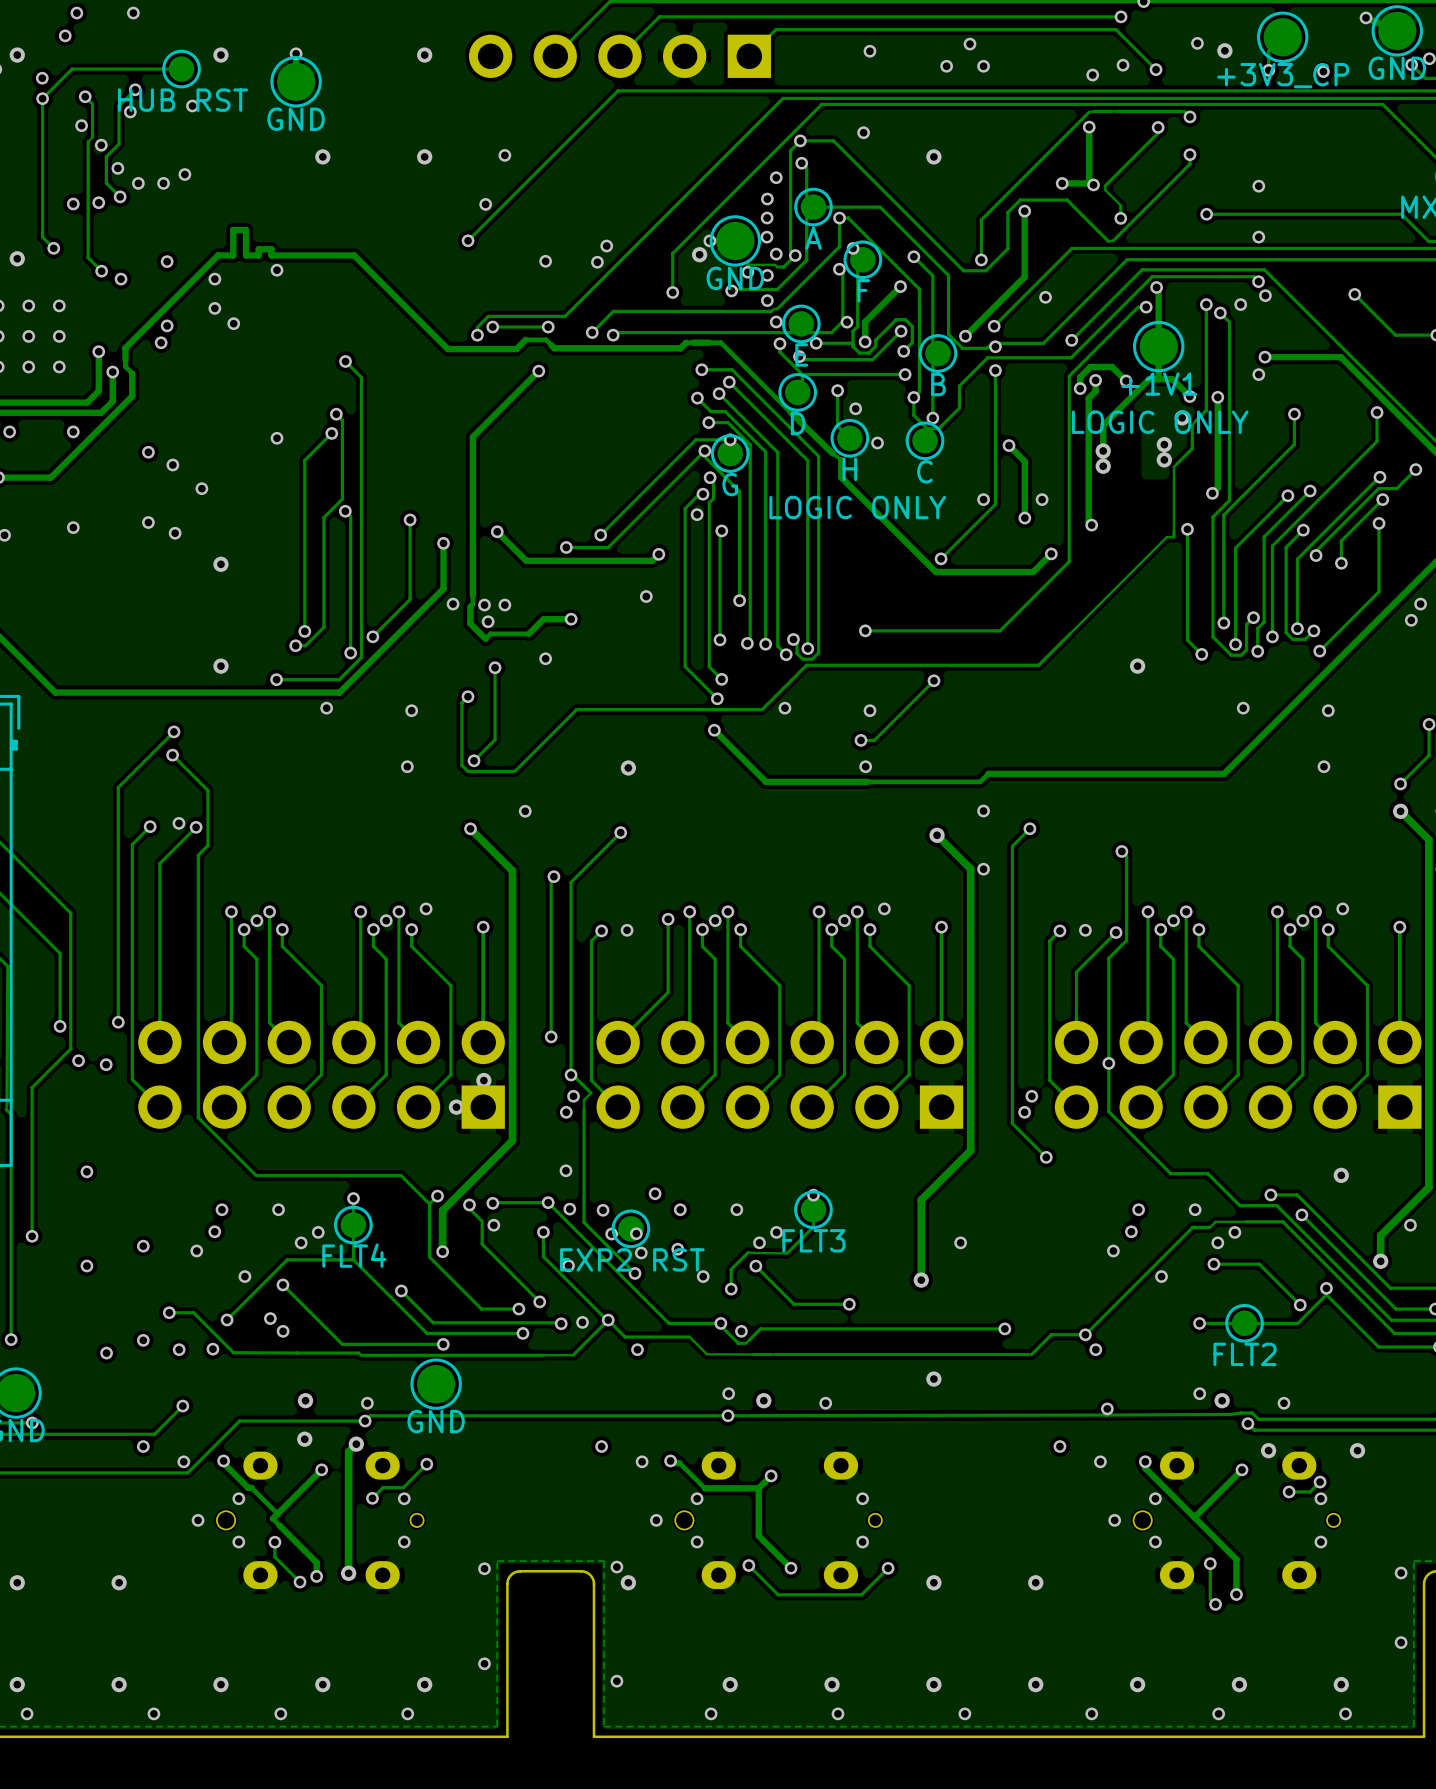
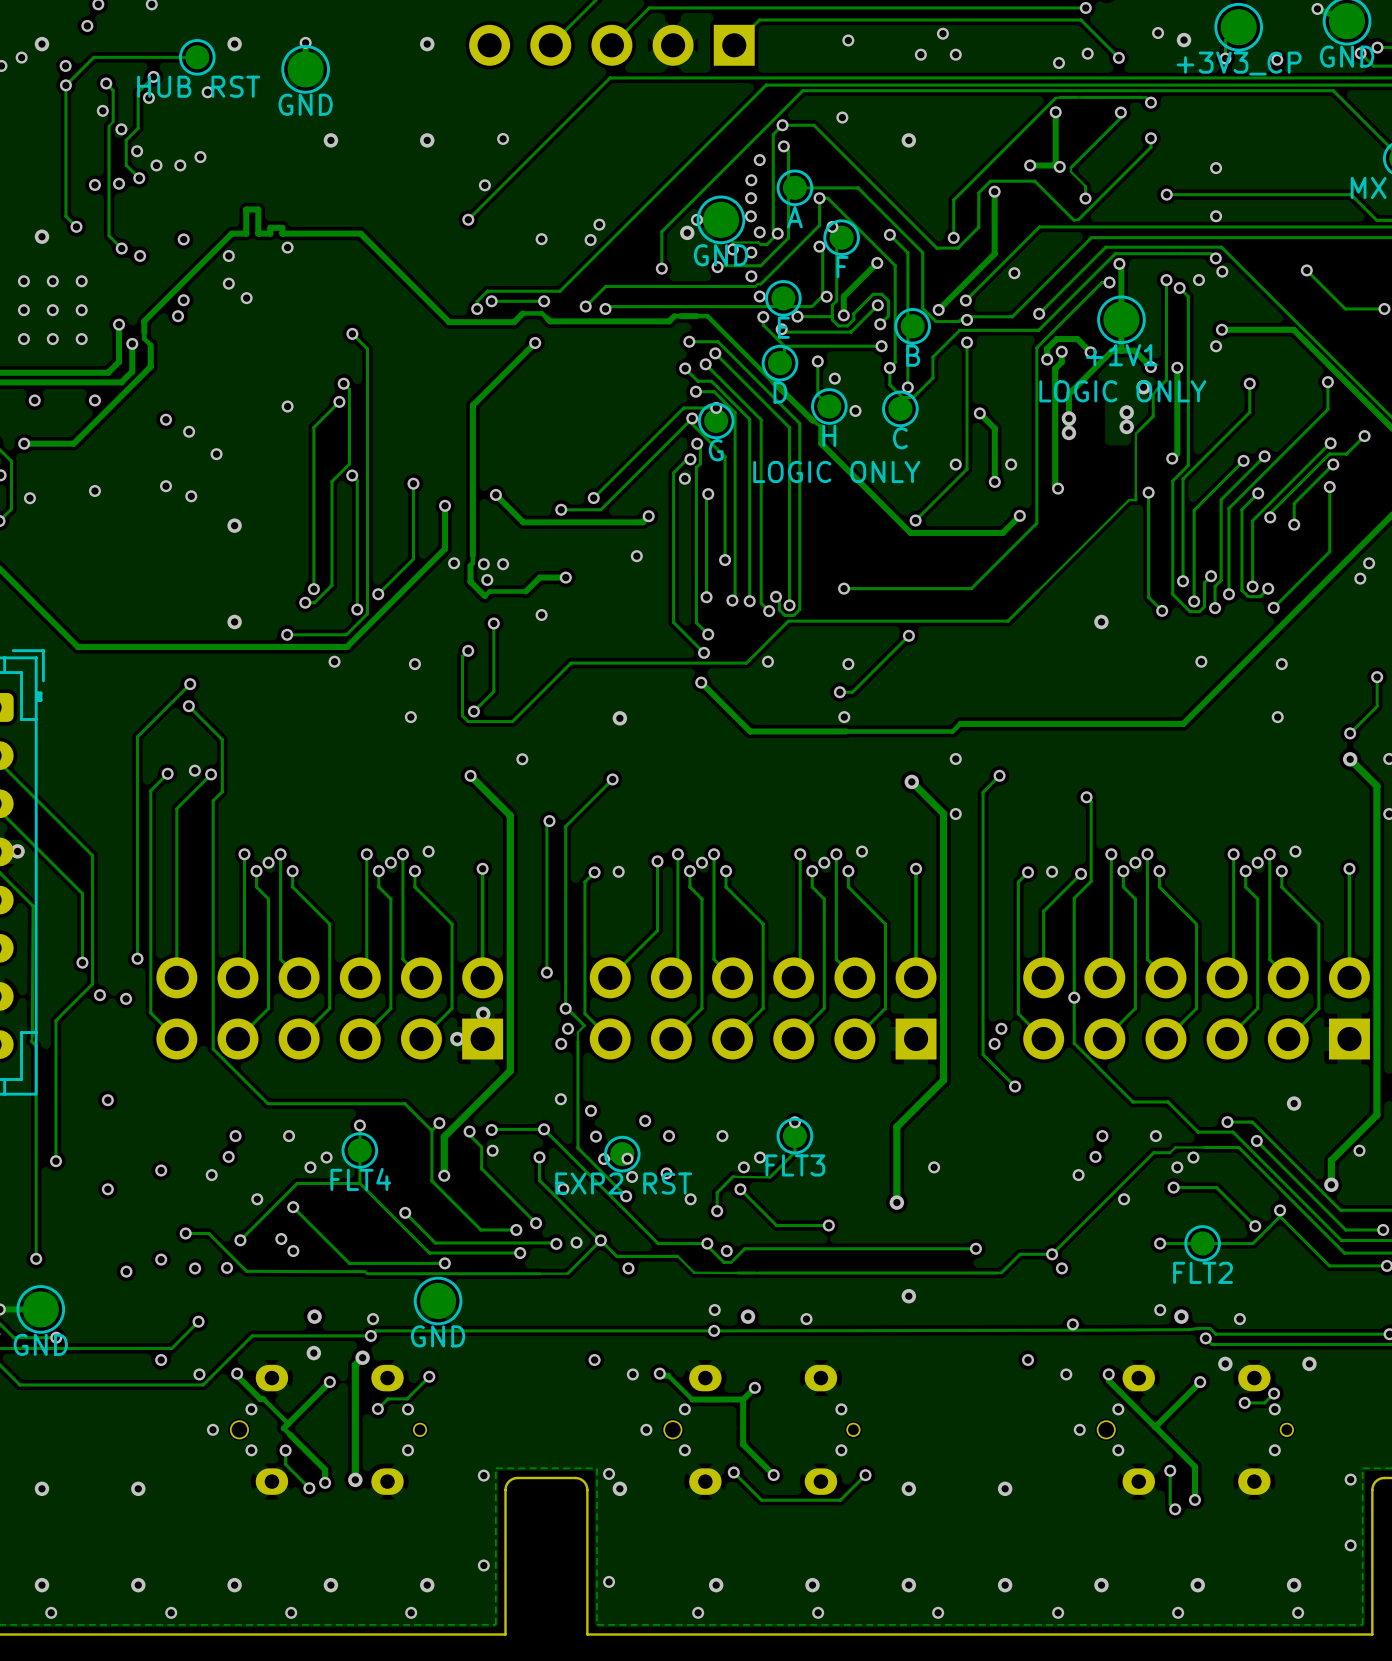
via position: (569, 1209) -> (590, 1110)

